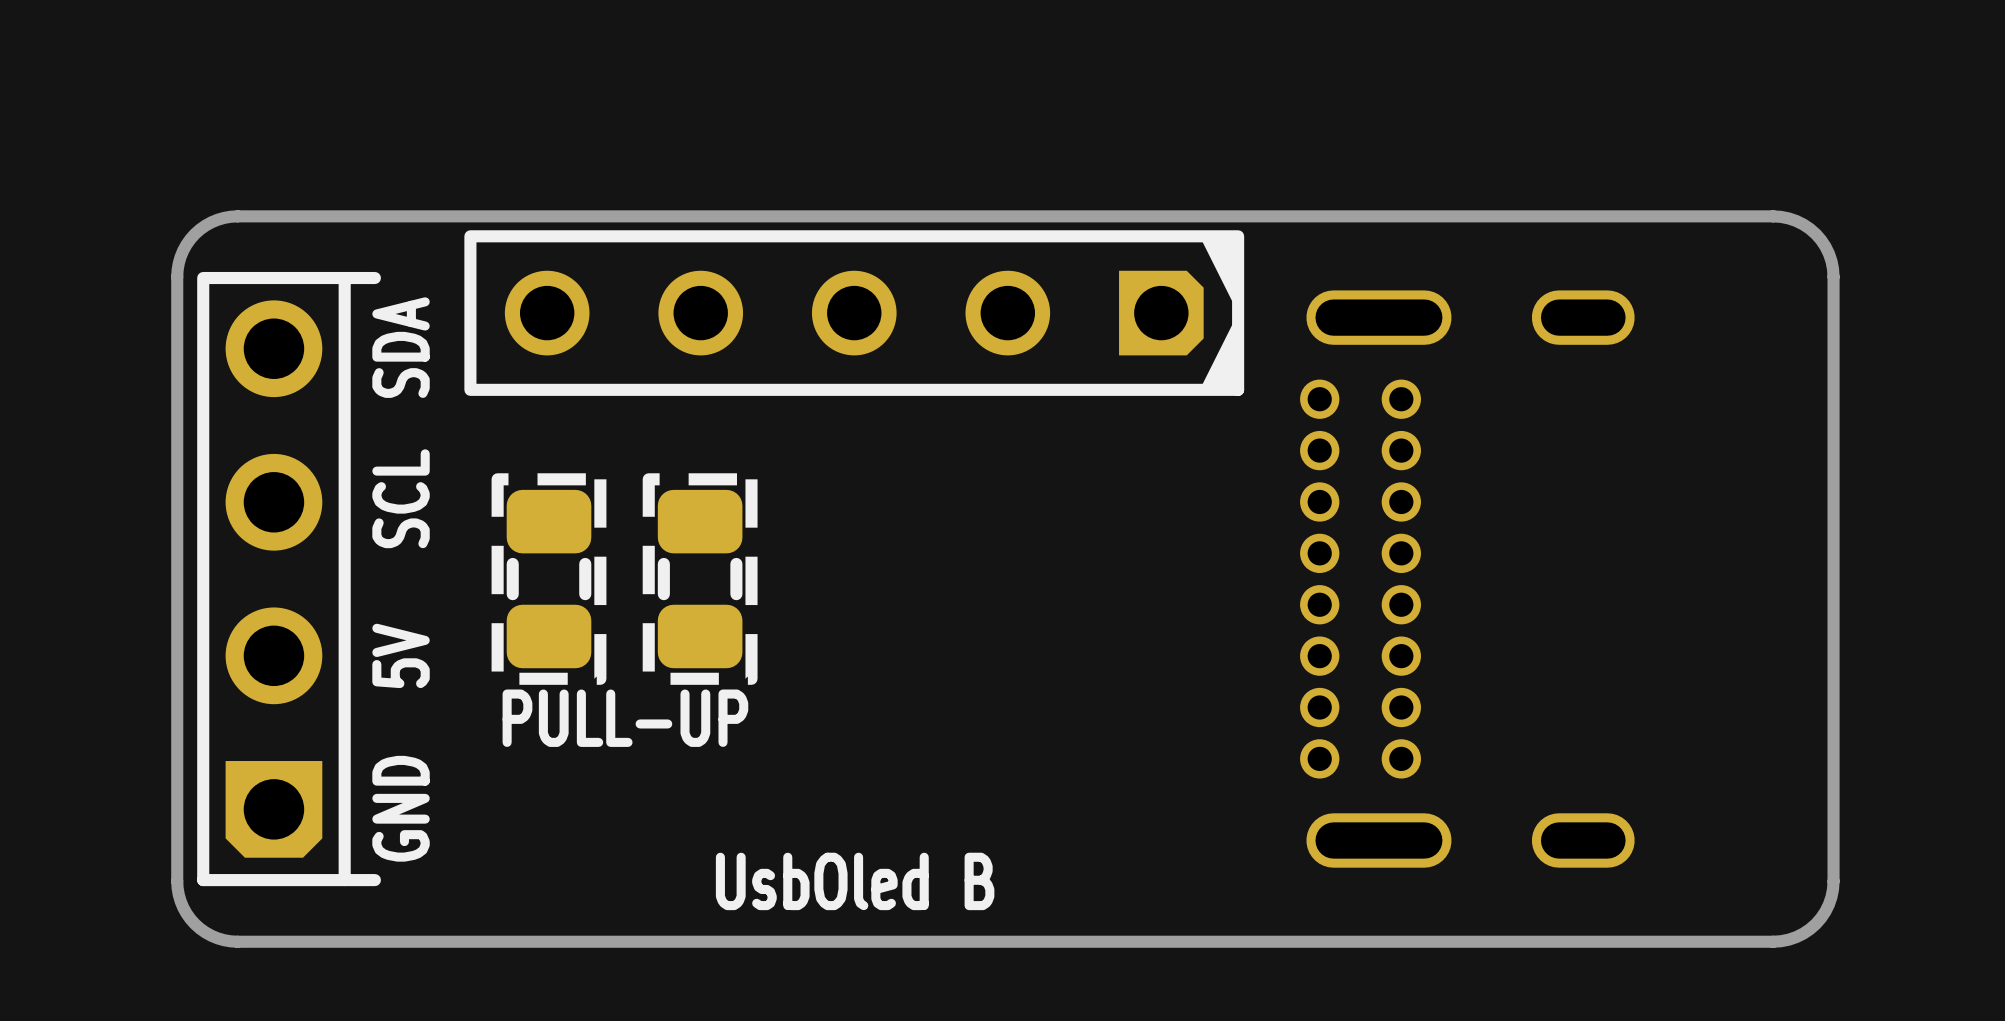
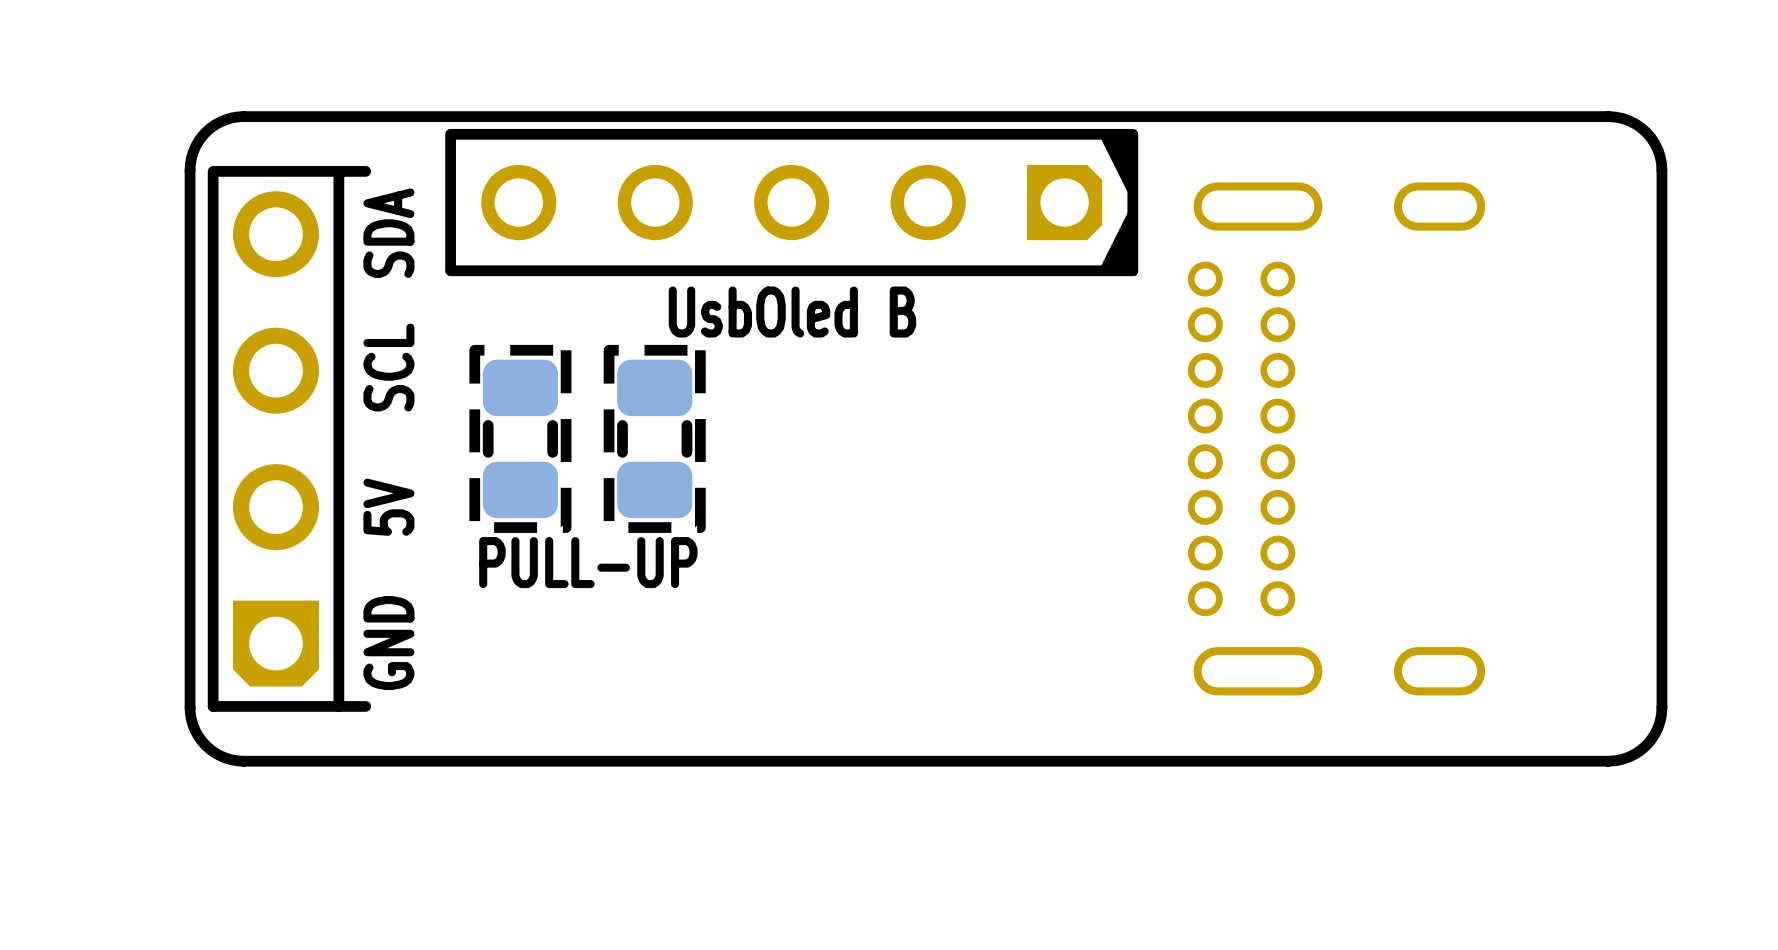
text position: UsbOled B (855, 881) -> UsbOled B (792, 312)

